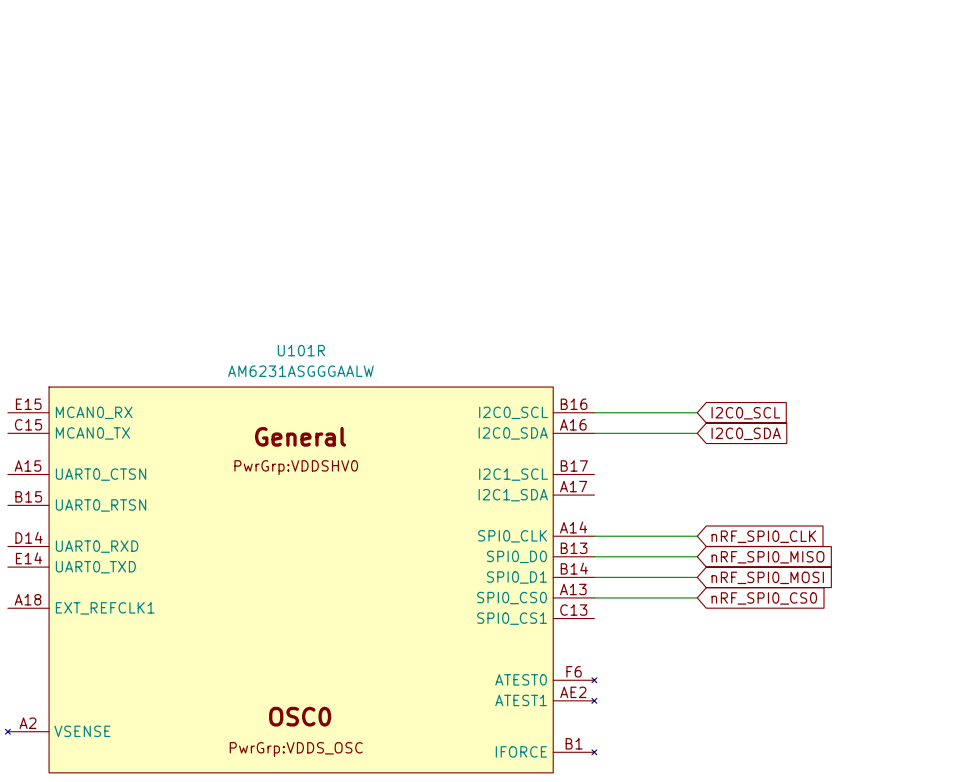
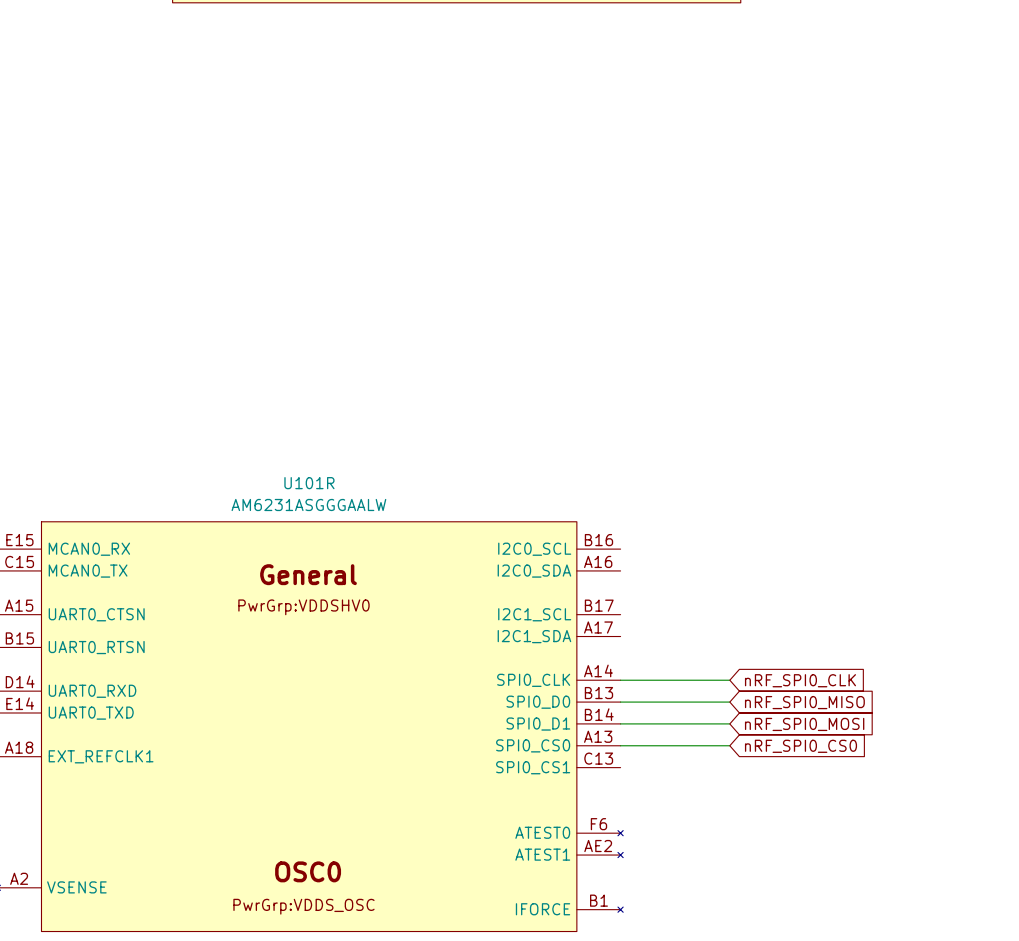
wire: (594, 412) (697, 412) -> none
global label: I2C0_SCL (745, 413) -> none
wire: (594, 433) (697, 433) -> none
global label: I2C0_SDA (746, 433) -> none

